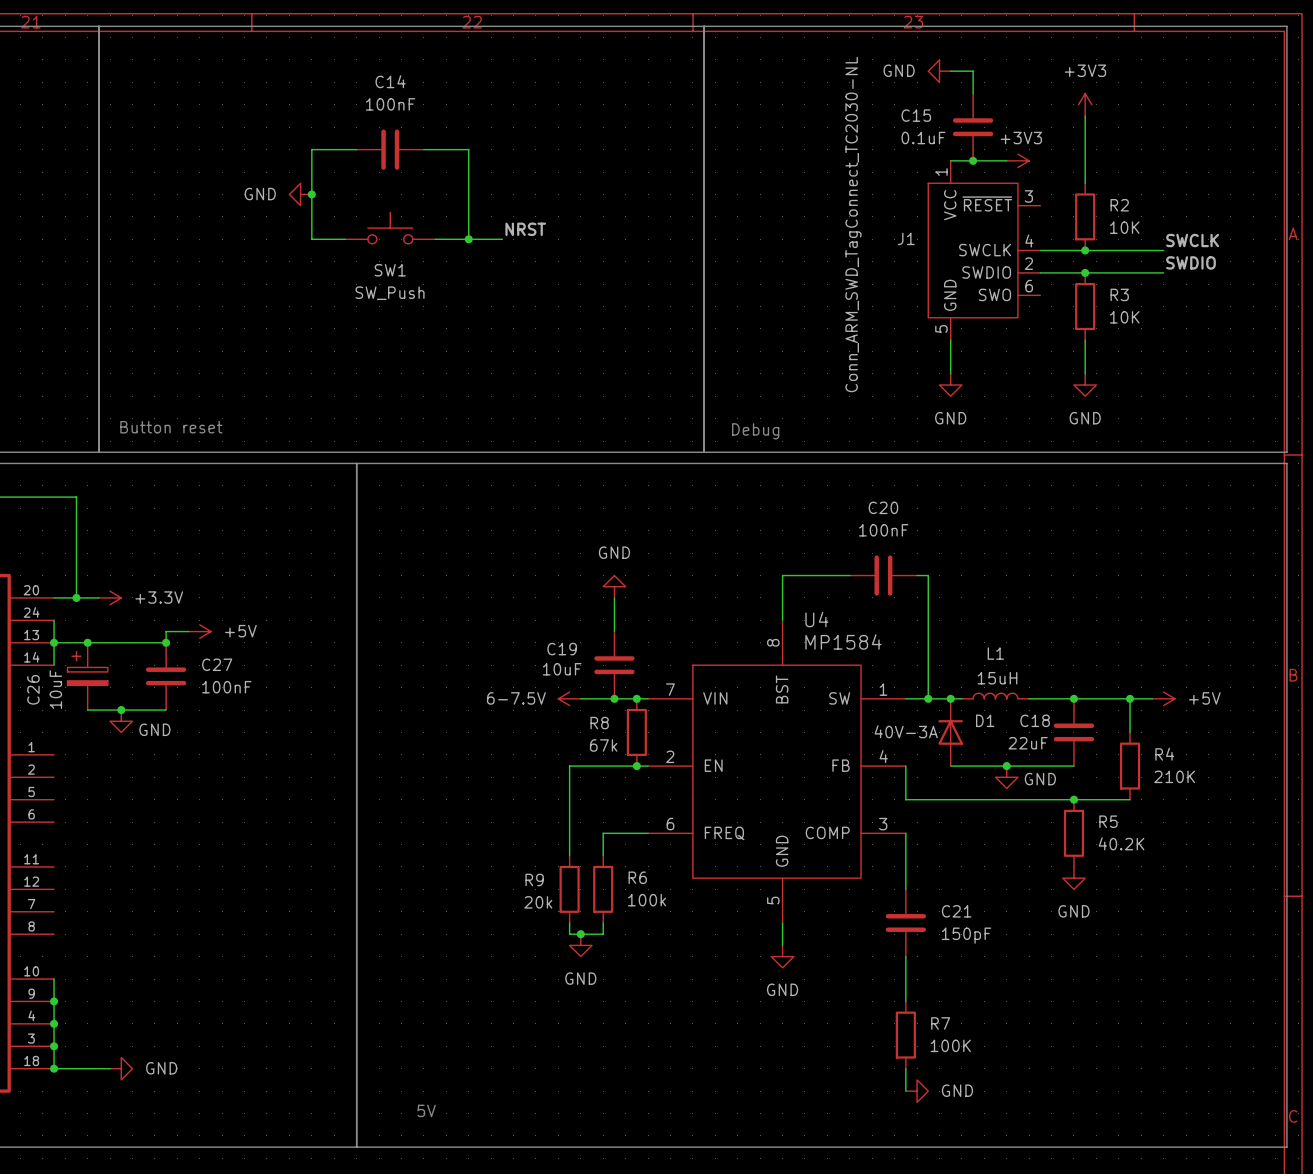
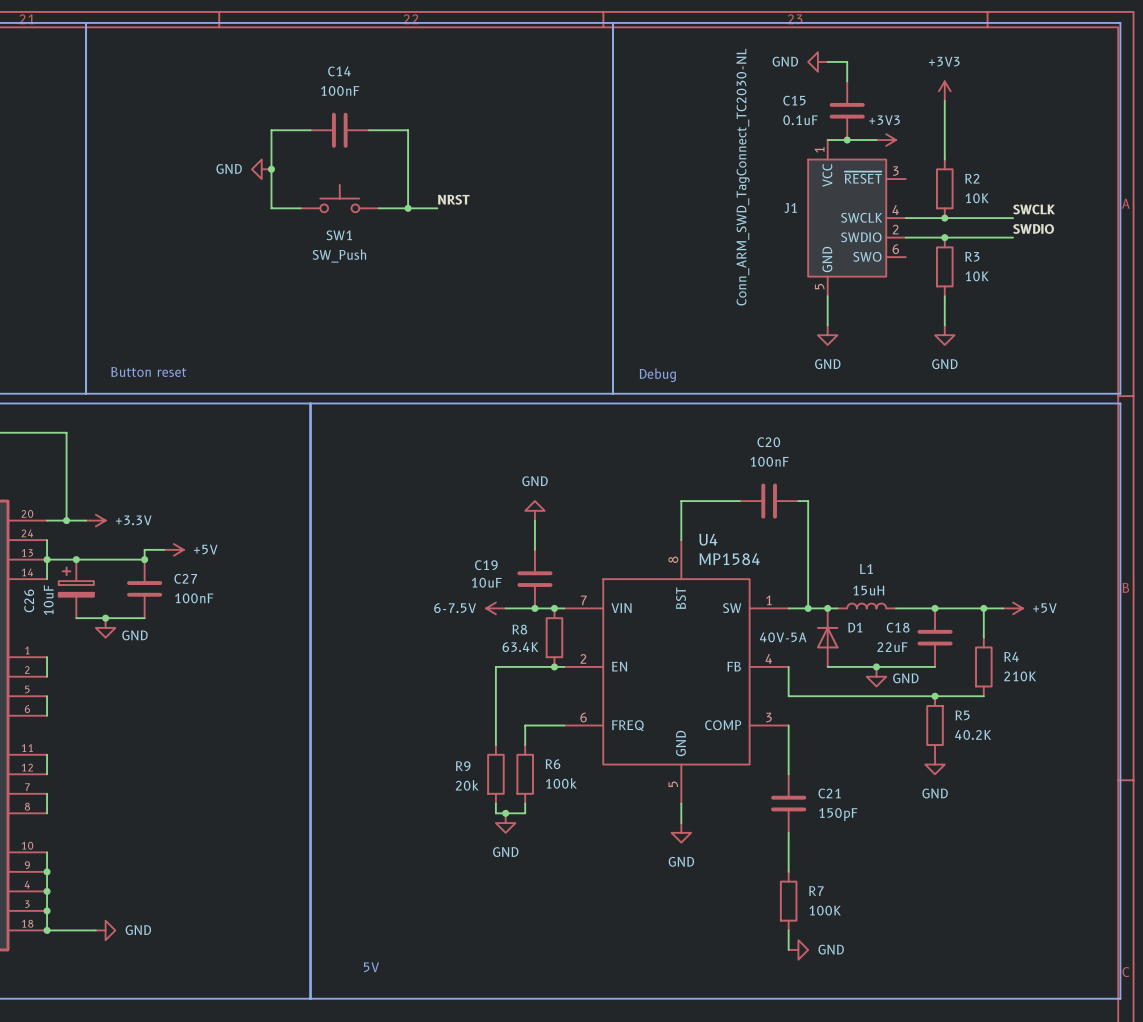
D1 value: 40V-3A (906, 731) -> 40V-5A (783, 637)
R8 value: 67k (603, 745) -> 63.4K (520, 647)
wire: none -> (47, 657) (47, 676)
wire: none -> (47, 696) (47, 715)
wire: none -> (47, 754) (47, 774)
wire: none -> (47, 793) (47, 813)

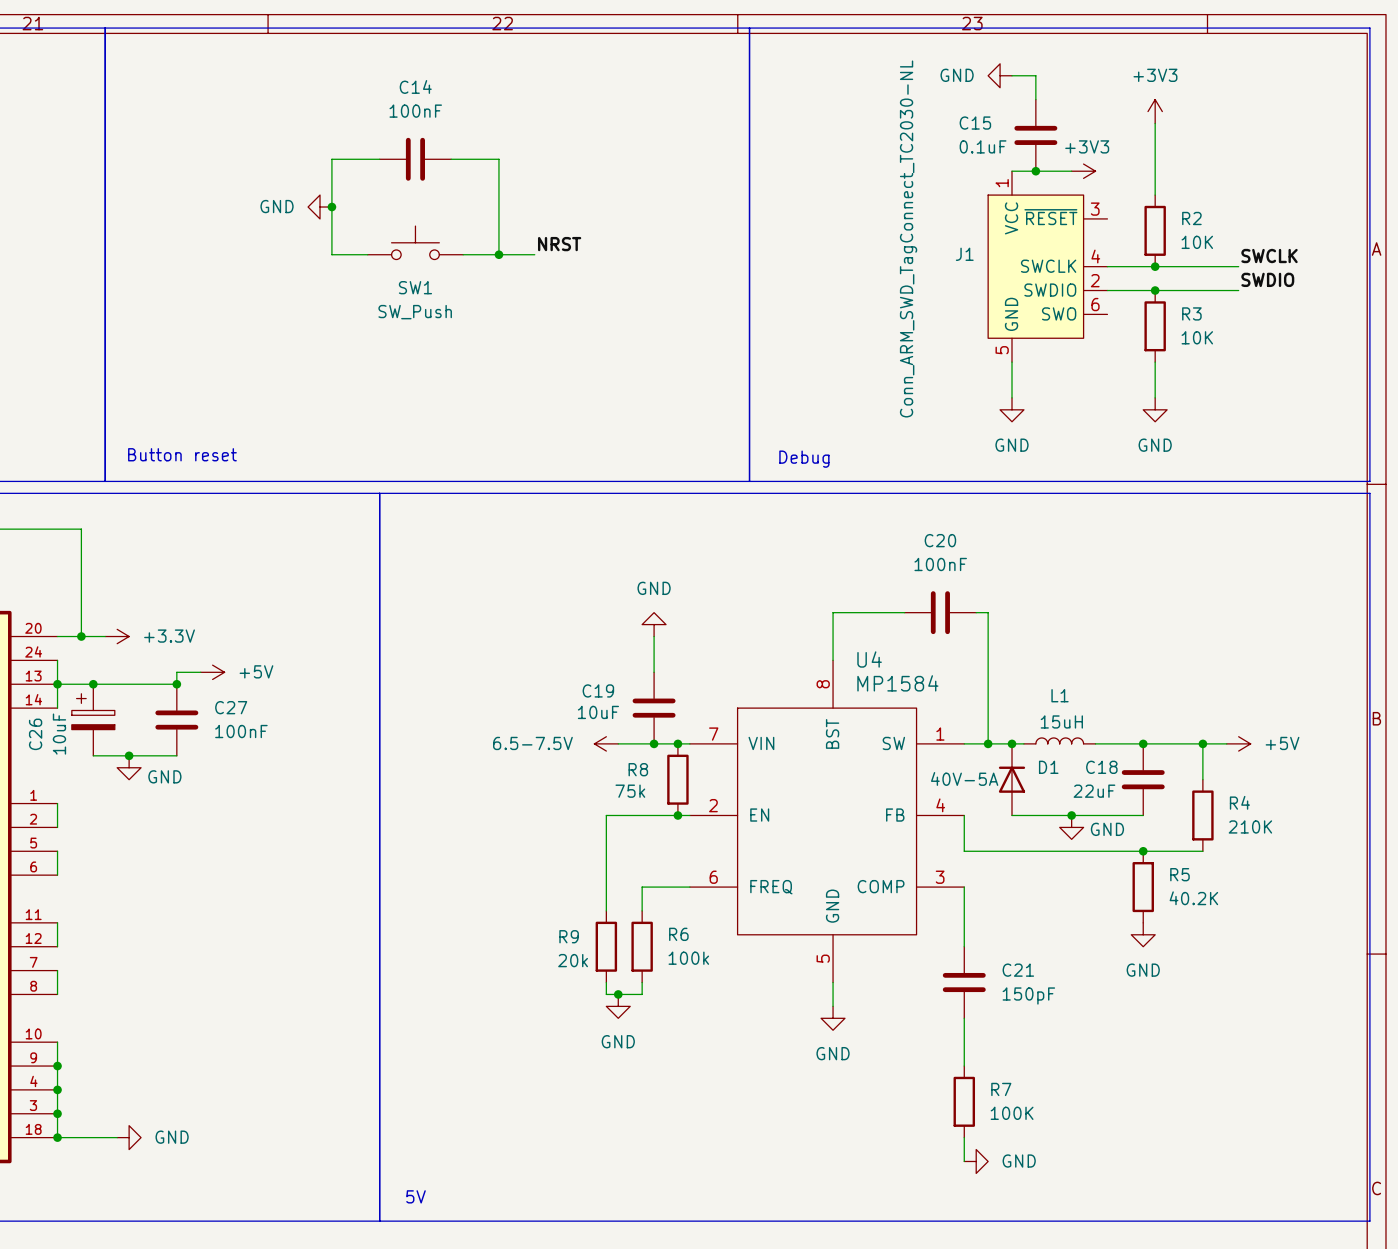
power symbol: 6-7.5V (495, 608) -> 6.5-7.5V (606, 743)
R8 value: 63.4K (520, 647) -> 75k (630, 791)
text position: 5V (371, 967) -> 5V (416, 1196)

